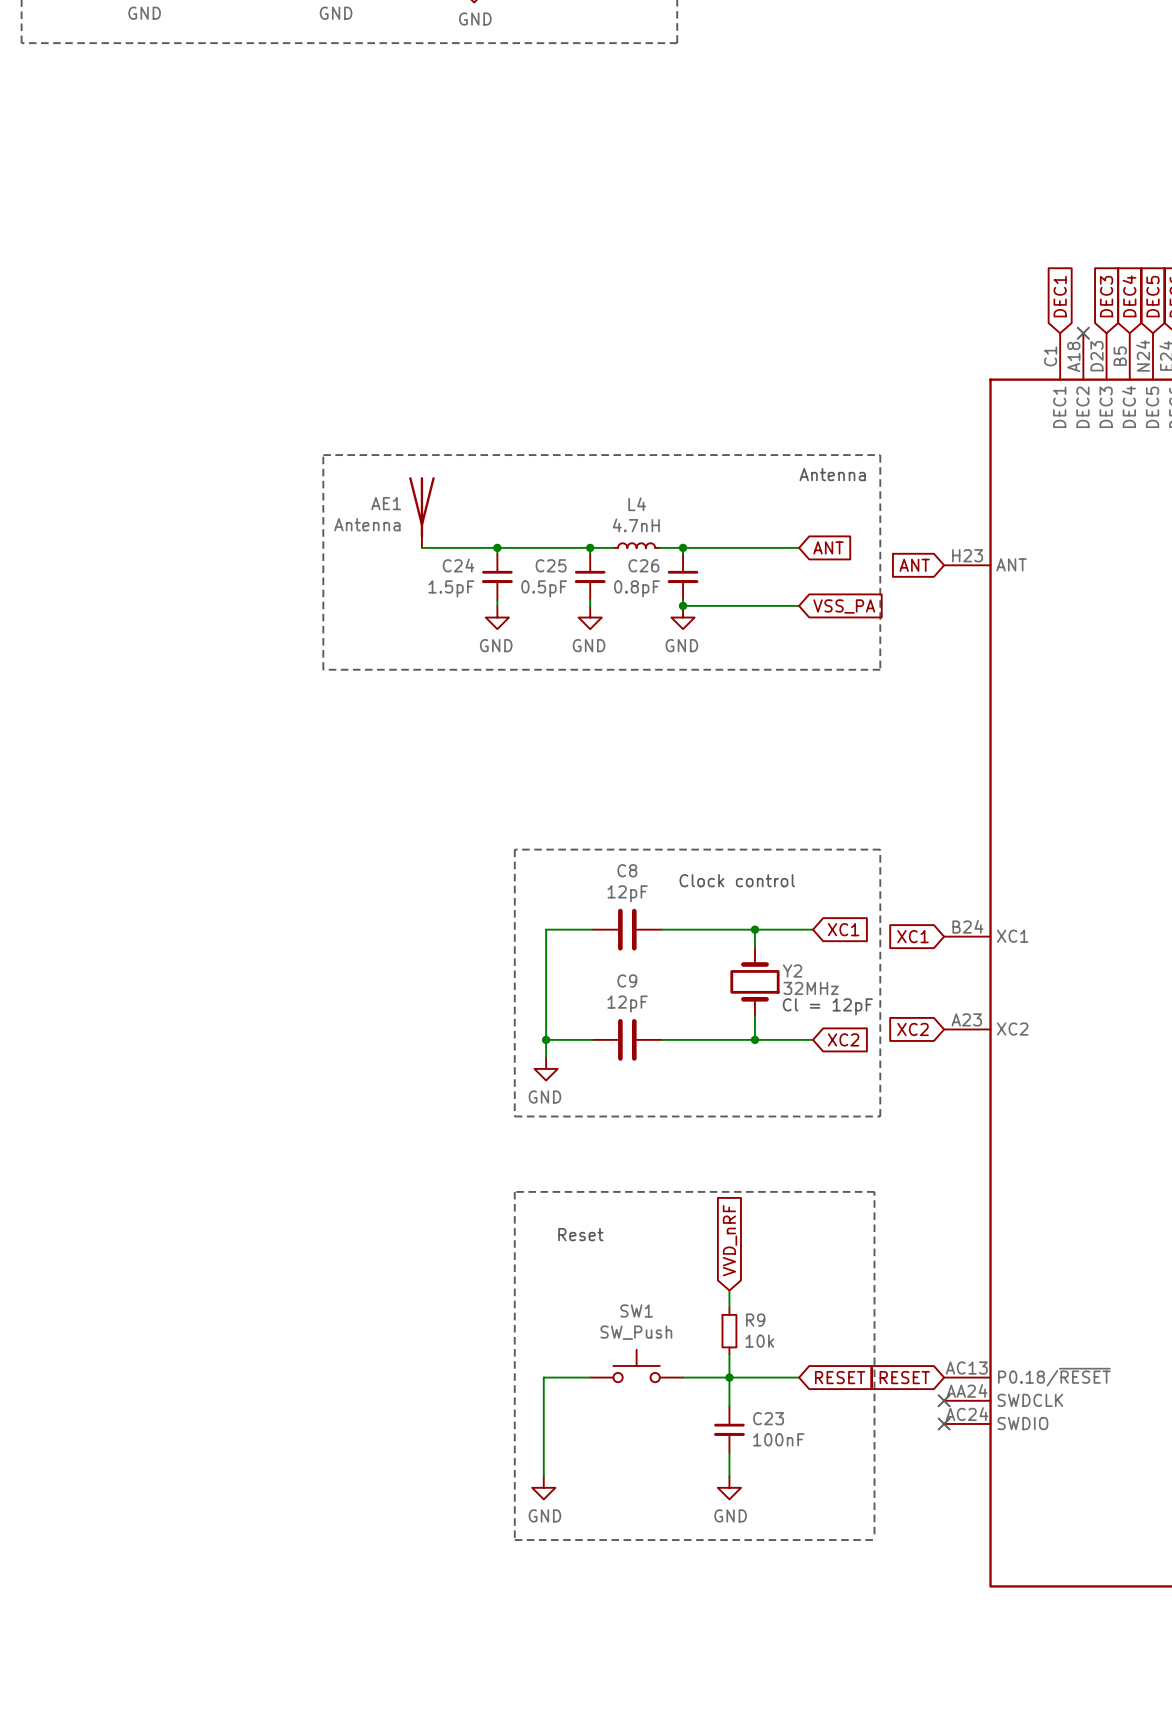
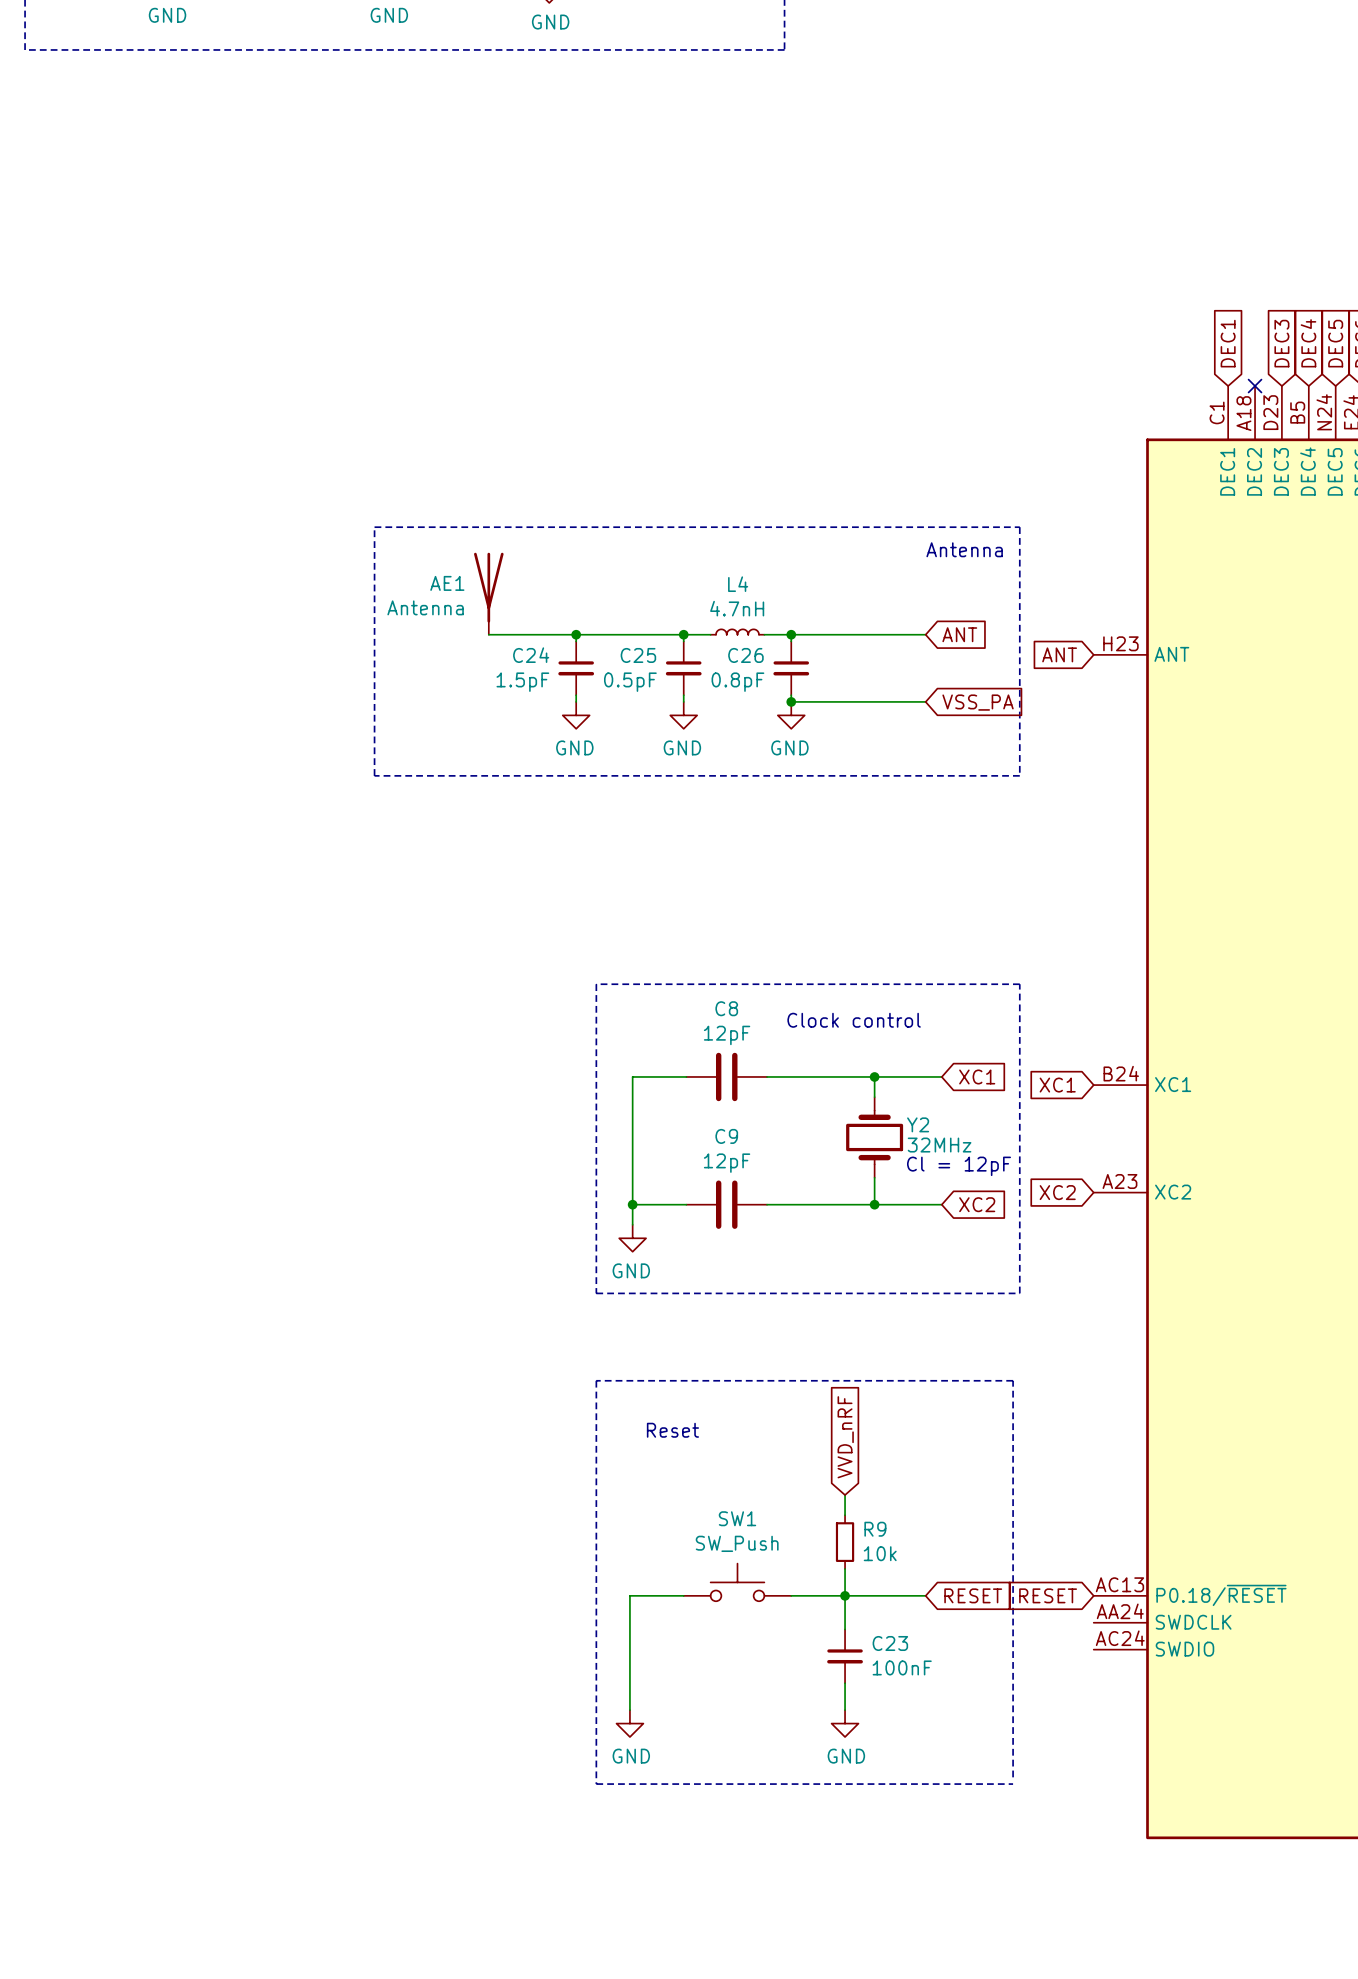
no-connect mark: (944, 1400) -> none
no-connect mark: (944, 1423) -> none

